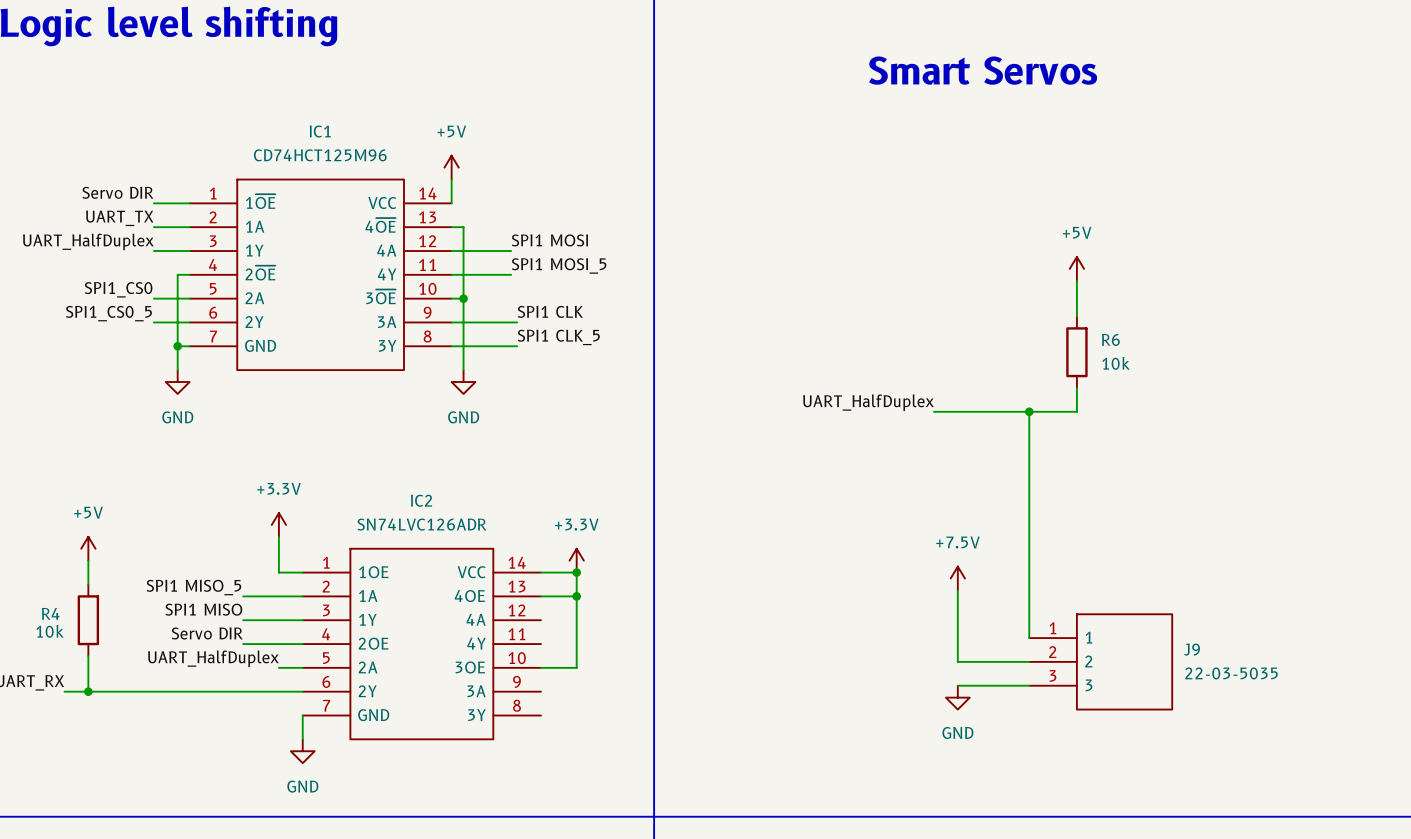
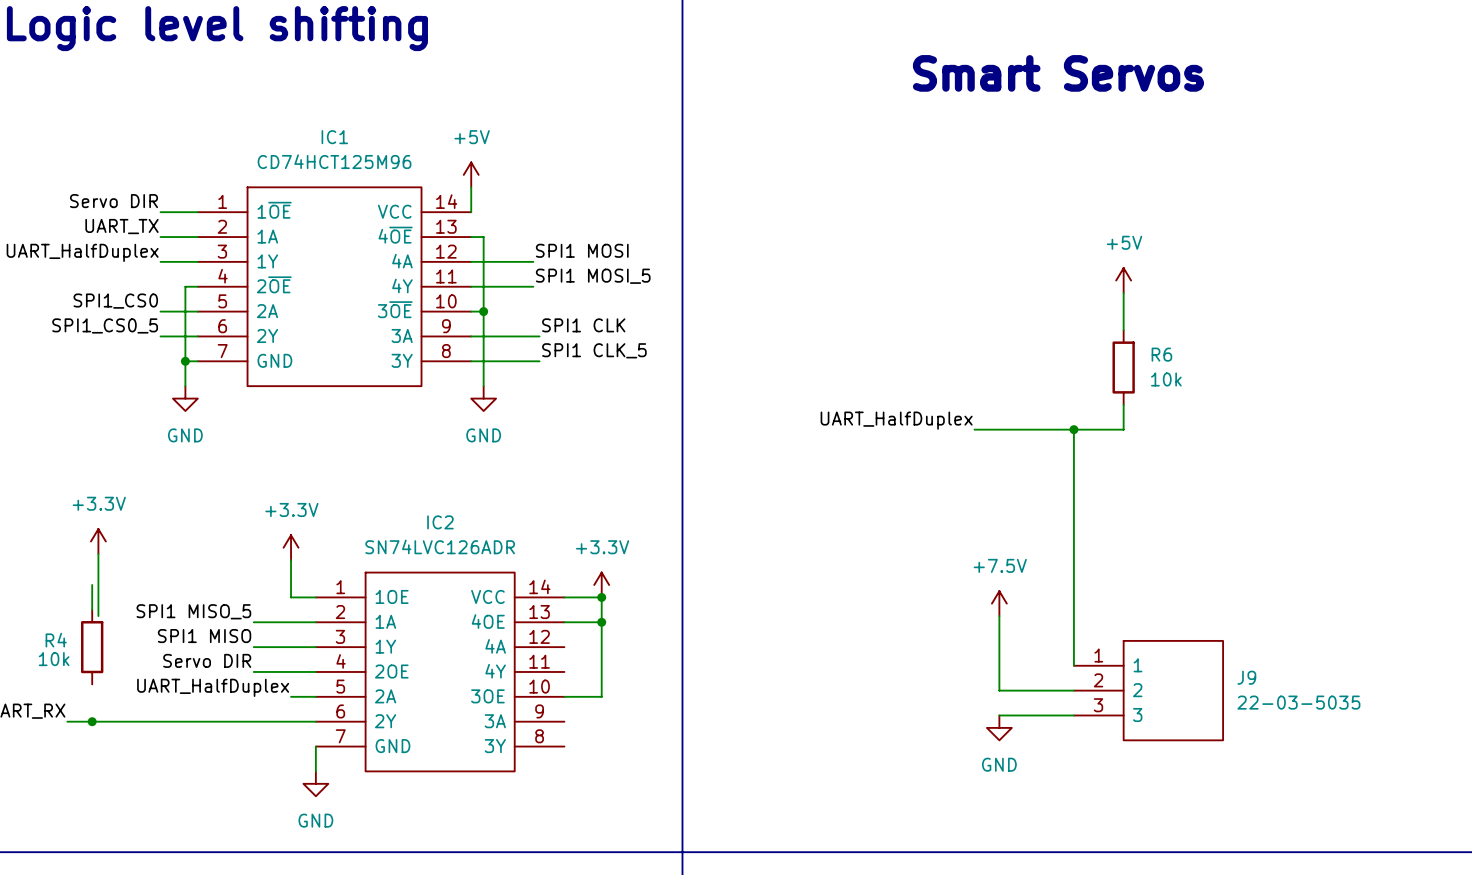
power symbol: none -> +3.3V (98, 541)
wire: none -> (98, 553) (98, 616)
power symbol: +5V (88, 548) -> none
wire: (88, 655) (88, 691) -> none

